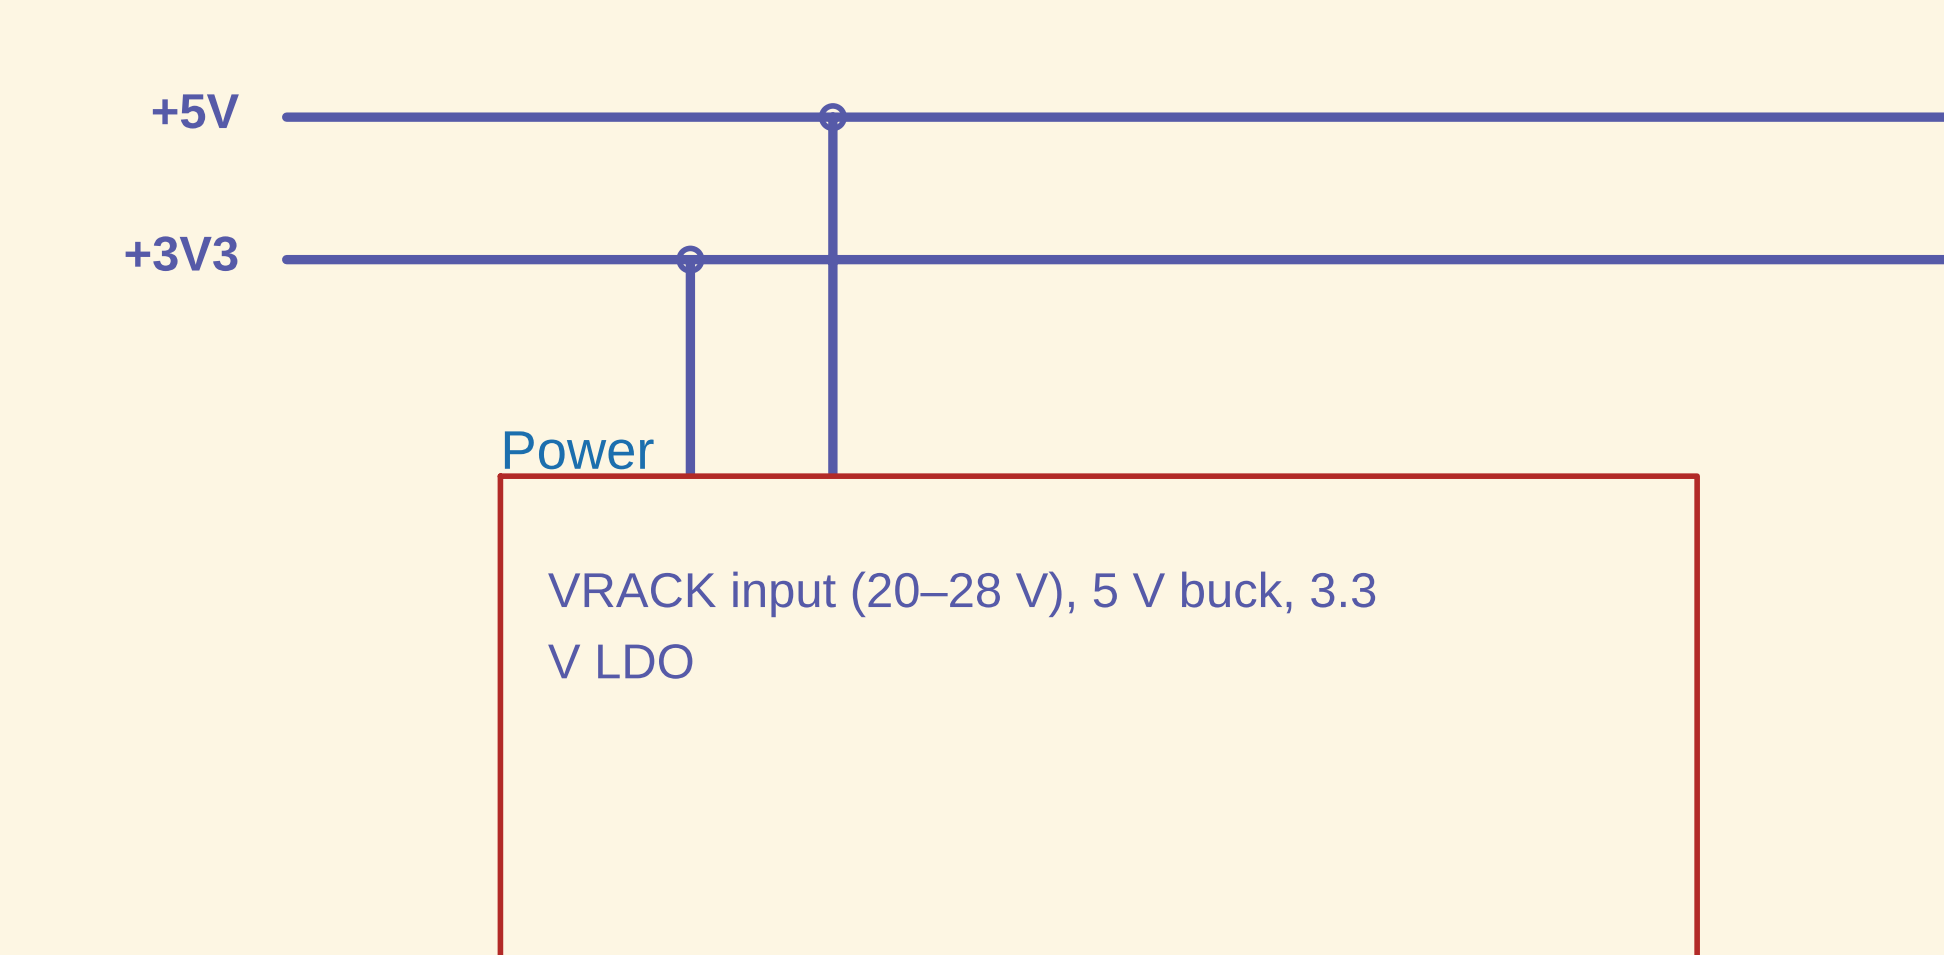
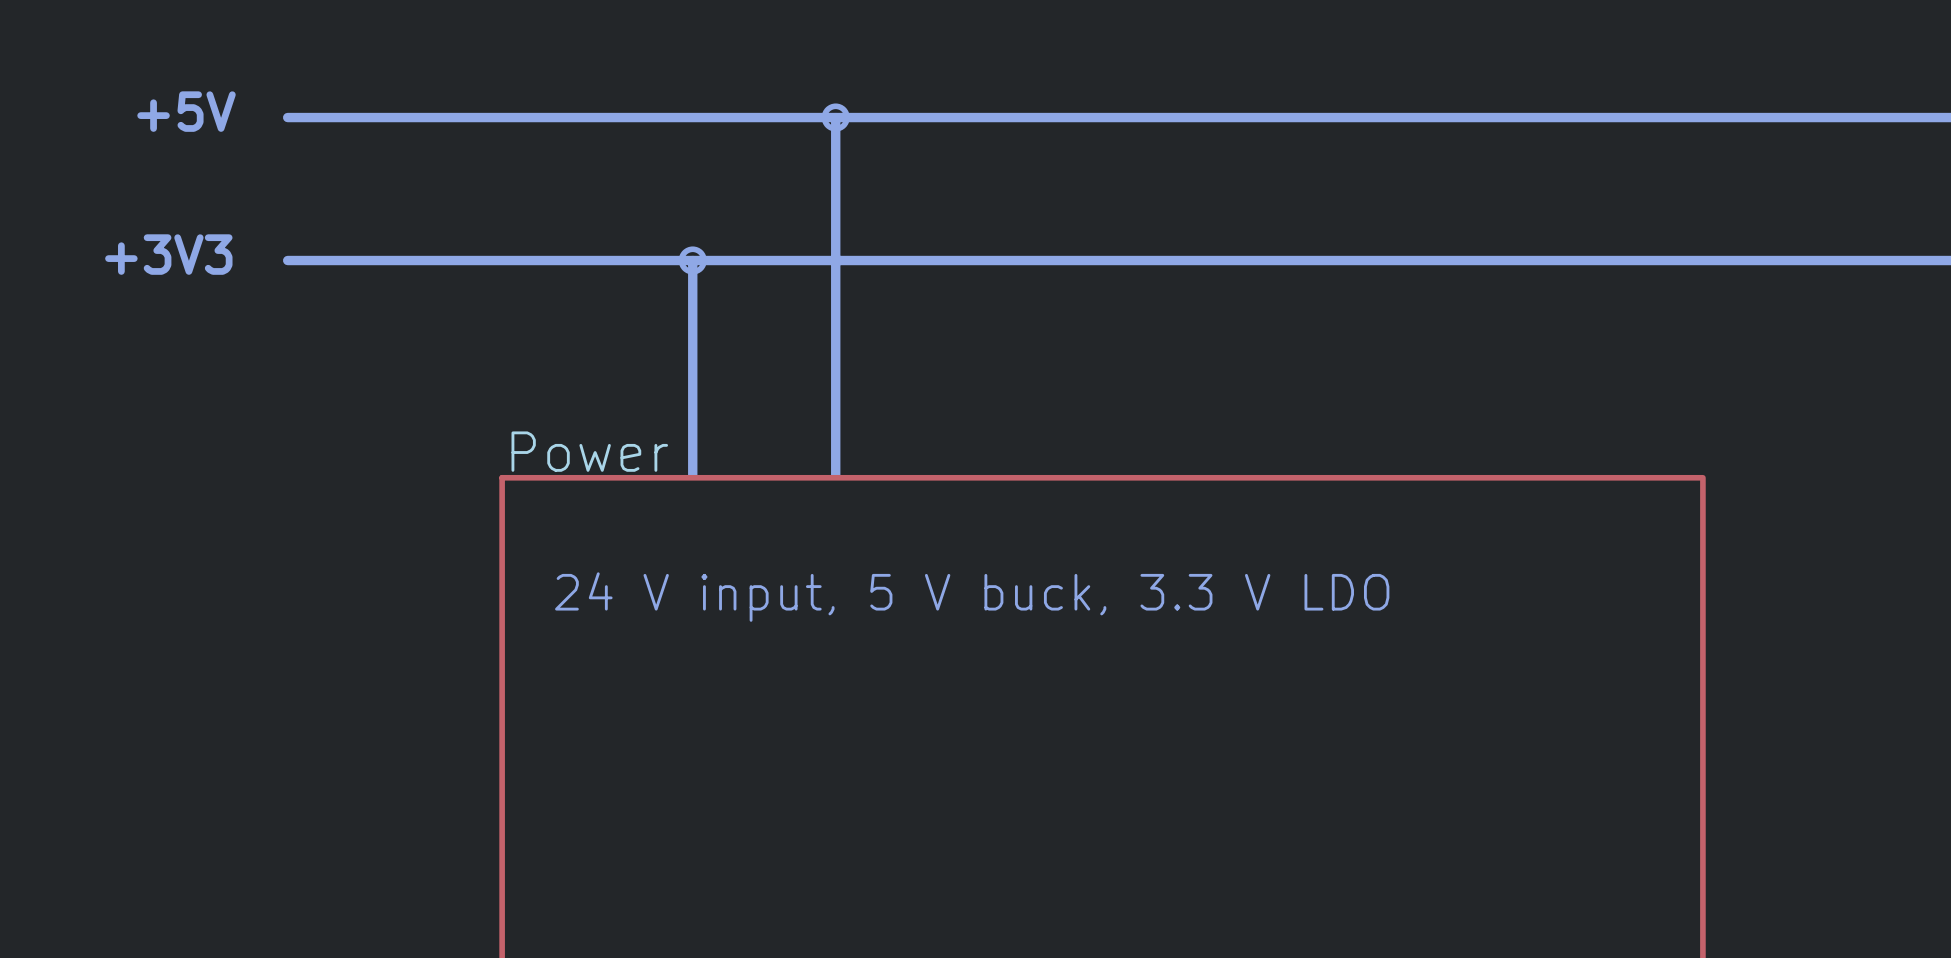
text: VRACK input (20–28 V), 5 V buck, 3.3 (961, 594) -> 24 V input, 5 V buck, 3.3 V LDO (972, 597)
text: V LDO (620, 661) -> none

